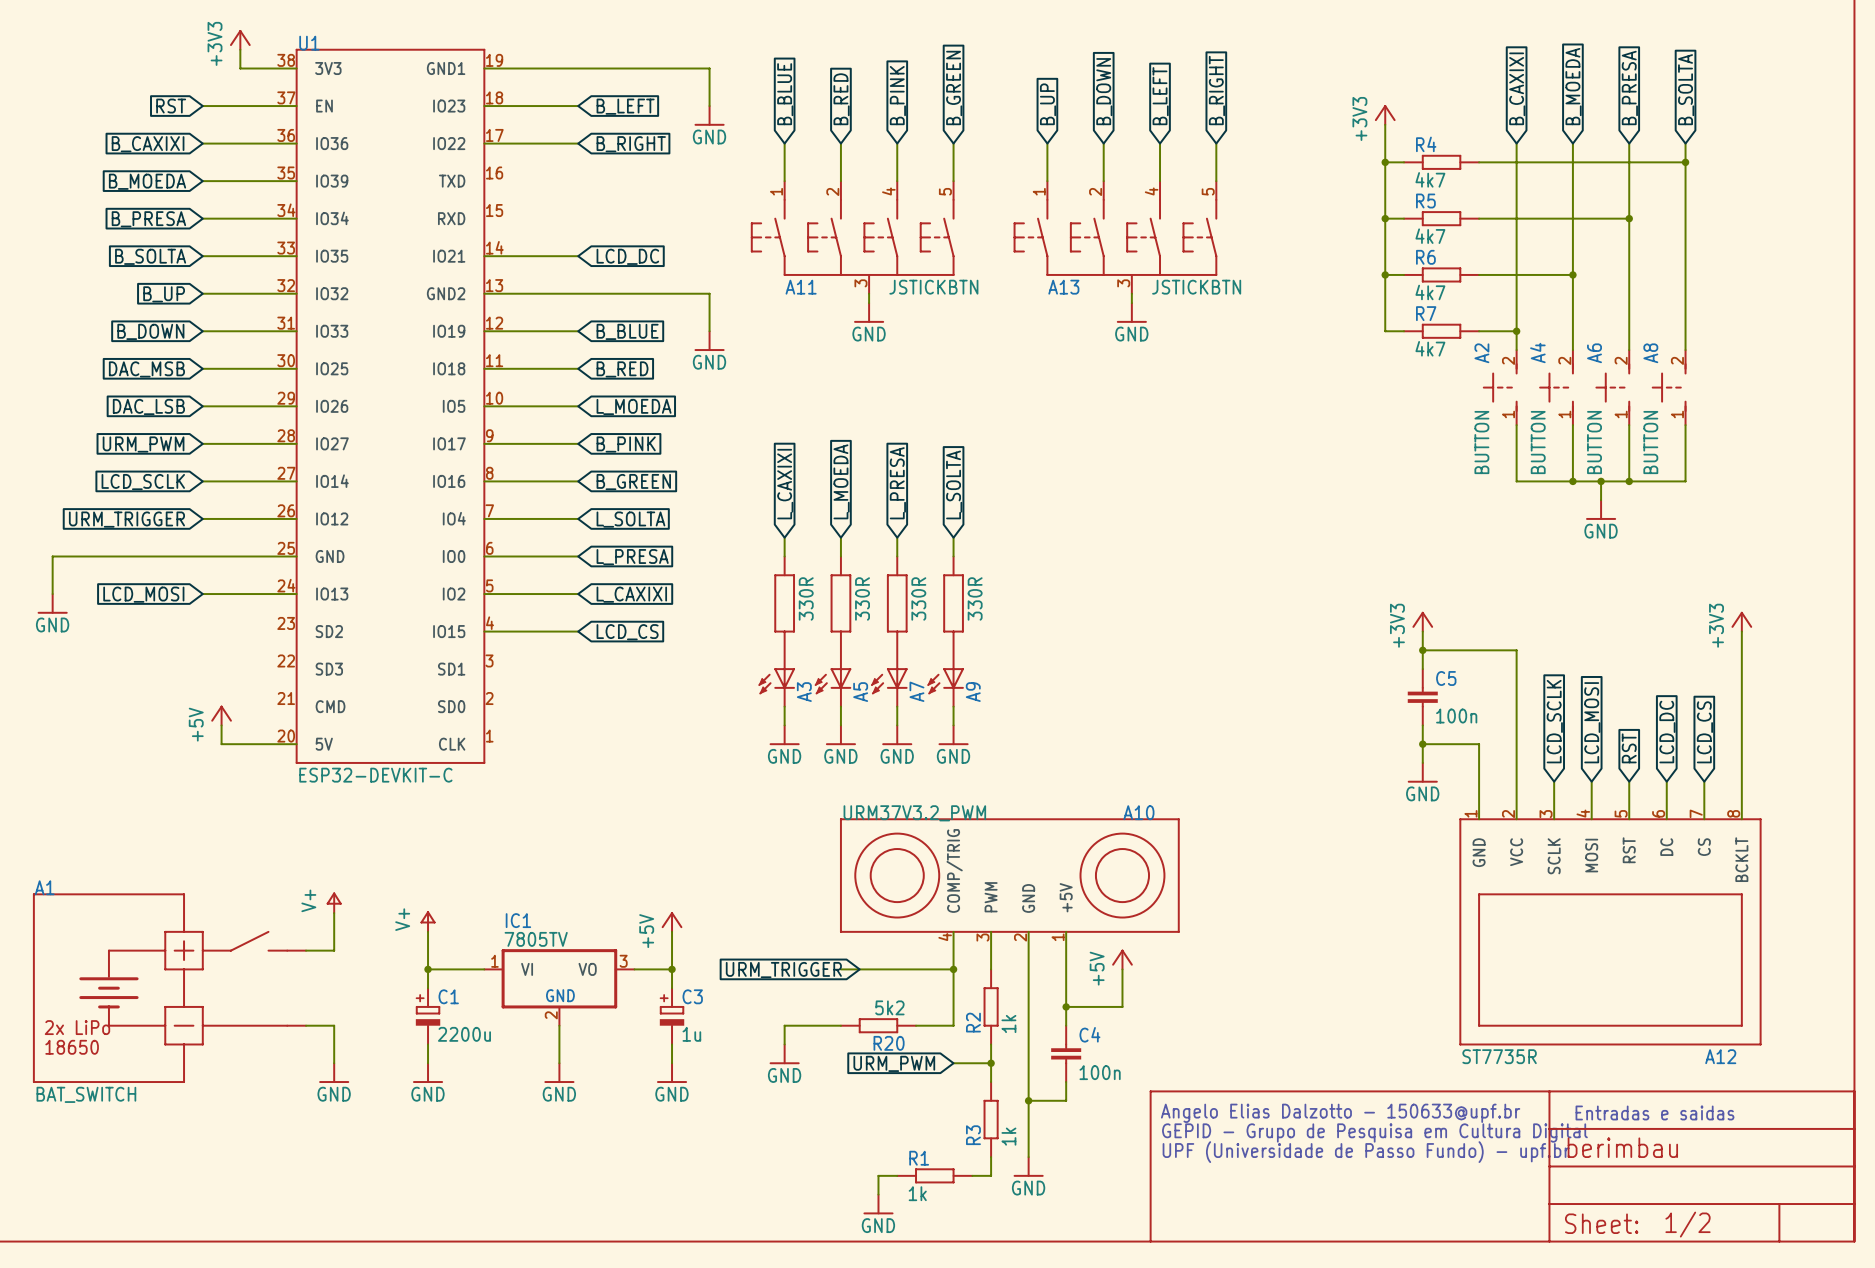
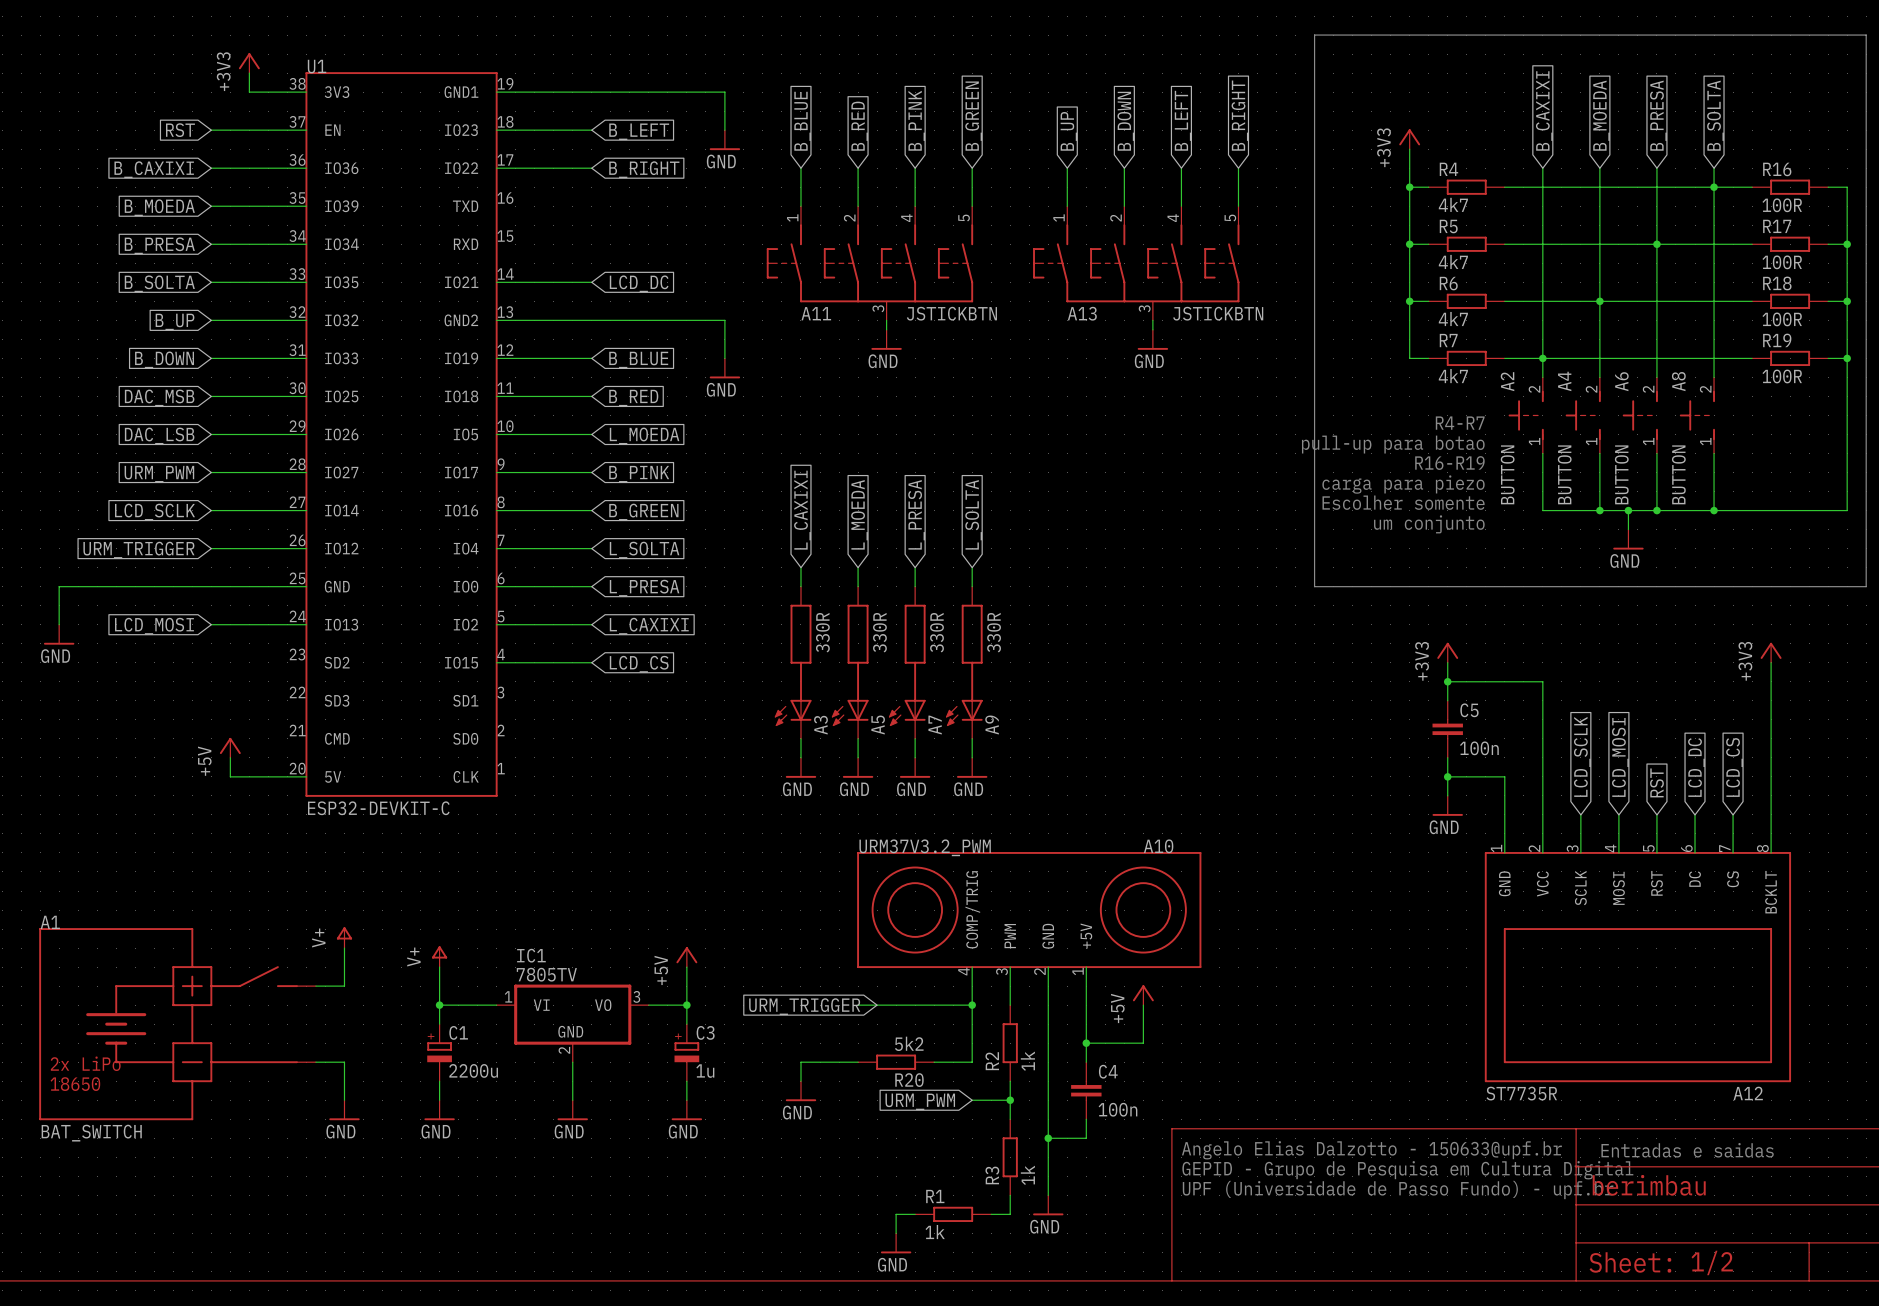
line: none -> (1314, 35) (1314, 586) (1866, 586) (1866, 35) (1314, 35)
wire: none -> (1714, 187) (1752, 187)
R16: none -> 100R (1790, 187)
wire: none -> (1828, 187) (1847, 187) (1847, 510) (1714, 510)
wire: none -> (1656, 244) (1752, 244)
R17: none -> 100R (1790, 244)
wire: none -> (1828, 244) (1847, 244)
junction: none -> (1847, 244)
wire: none -> (1599, 301) (1752, 301)
R18: none -> 100R (1790, 301)
wire: none -> (1828, 301) (1847, 301)
junction: none -> (1847, 301)
wire: none -> (1542, 358) (1752, 358)
R19: none -> 100R (1790, 358)
wire: none -> (1828, 358) (1847, 358)
junction: none -> (1847, 358)
text: none -> R4-R7 (1460, 423)
text: none -> pull-up para botao (1393, 444)
text: none -> R16-R19 (1449, 463)
text: none -> carga para piezo (1403, 484)
text: none -> Escolher somente (1403, 502)
junction: none -> (1714, 510)
text: none -> um conjunto (1429, 524)

